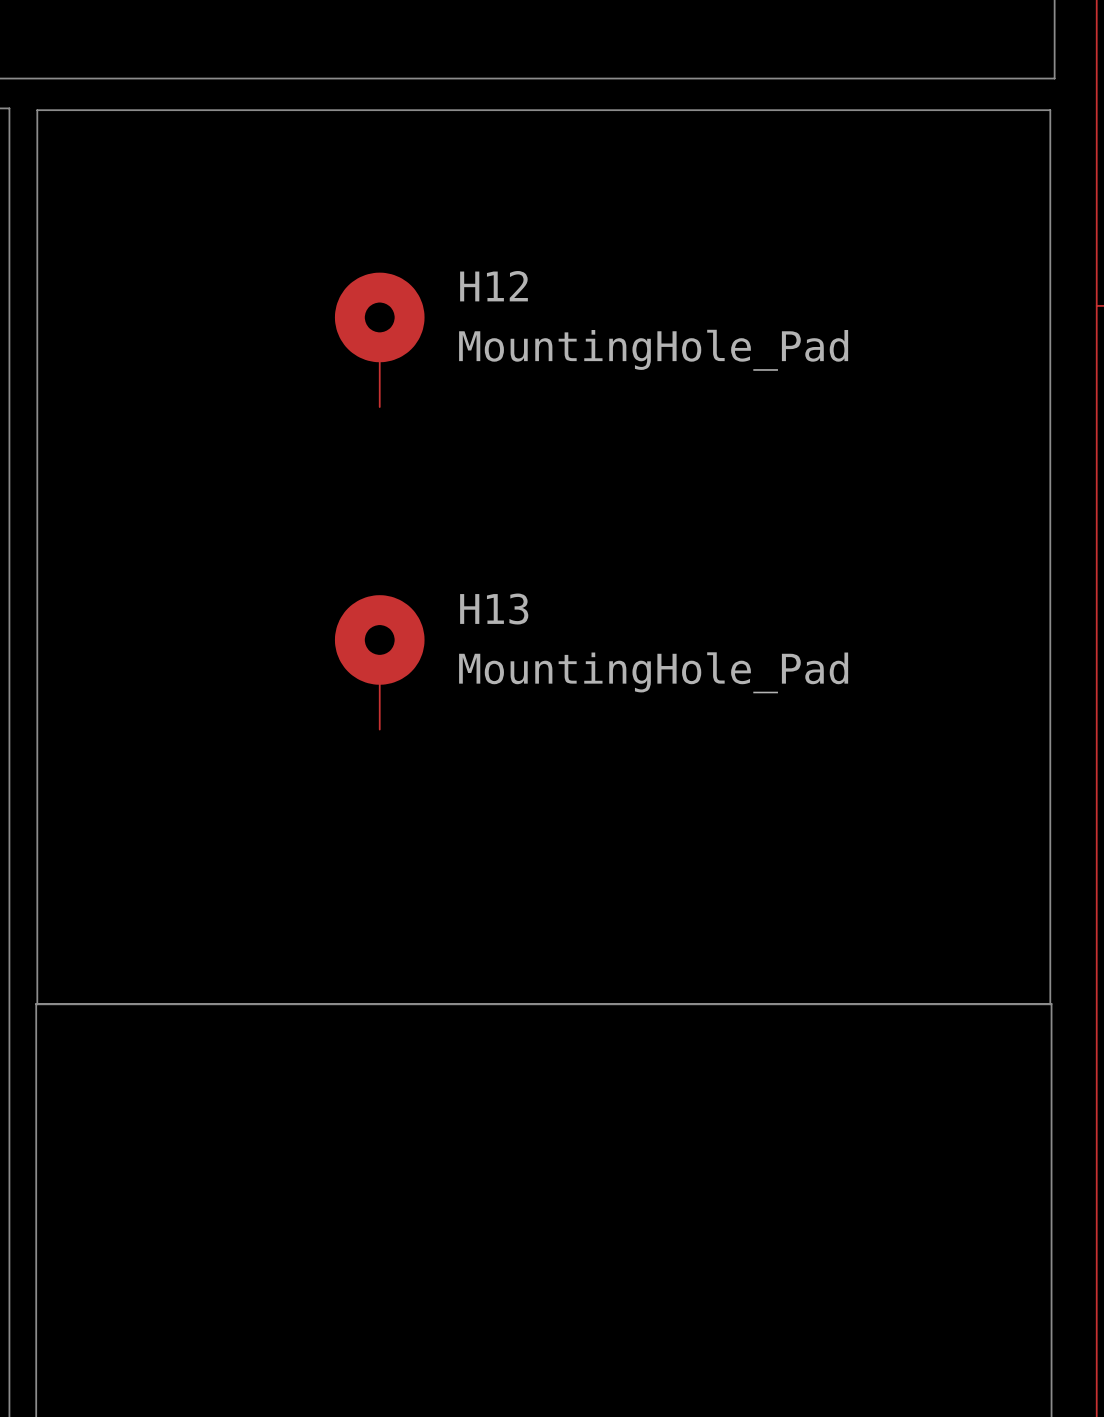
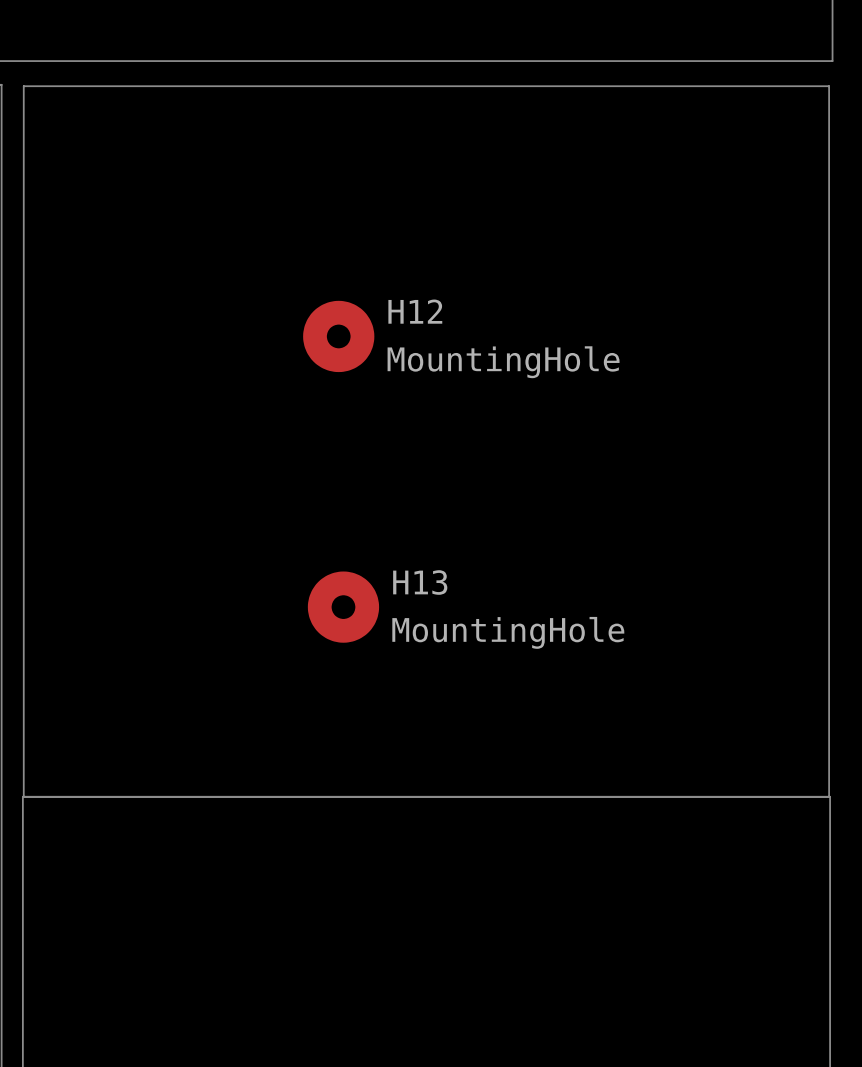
H12 symbol: [334, 272, 425, 408] -> [303, 300, 375, 373]
H12 value: MountingHole_Pad (653, 350) -> MountingHole (503, 362)
H13 symbol: [334, 595, 425, 730] -> [307, 571, 380, 643]
H13 value: MountingHole_Pad (653, 672) -> MountingHole (508, 632)

